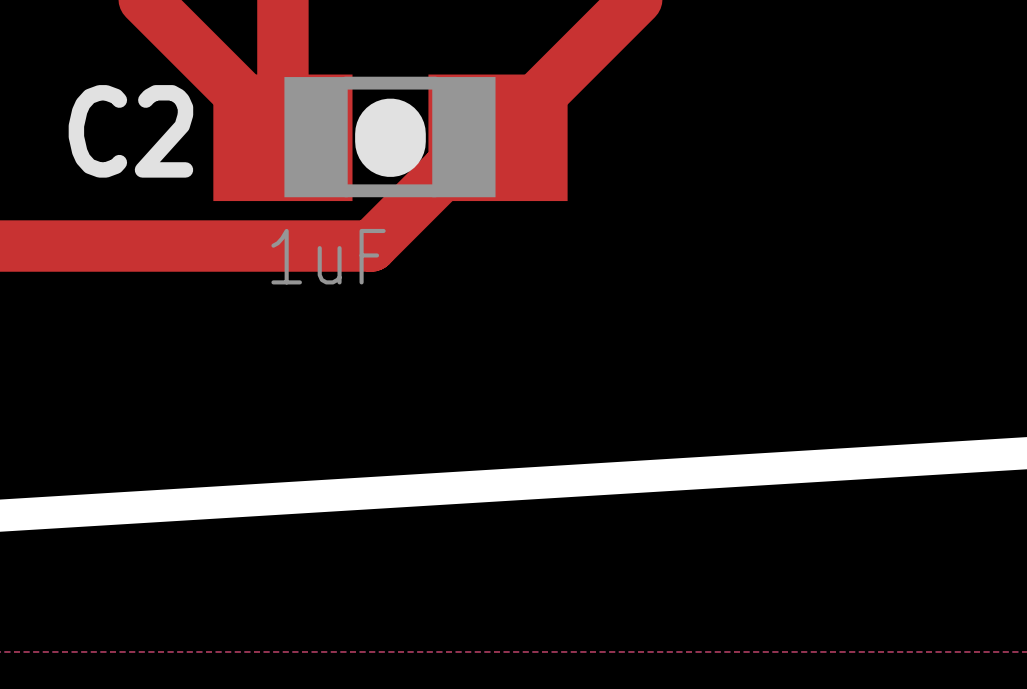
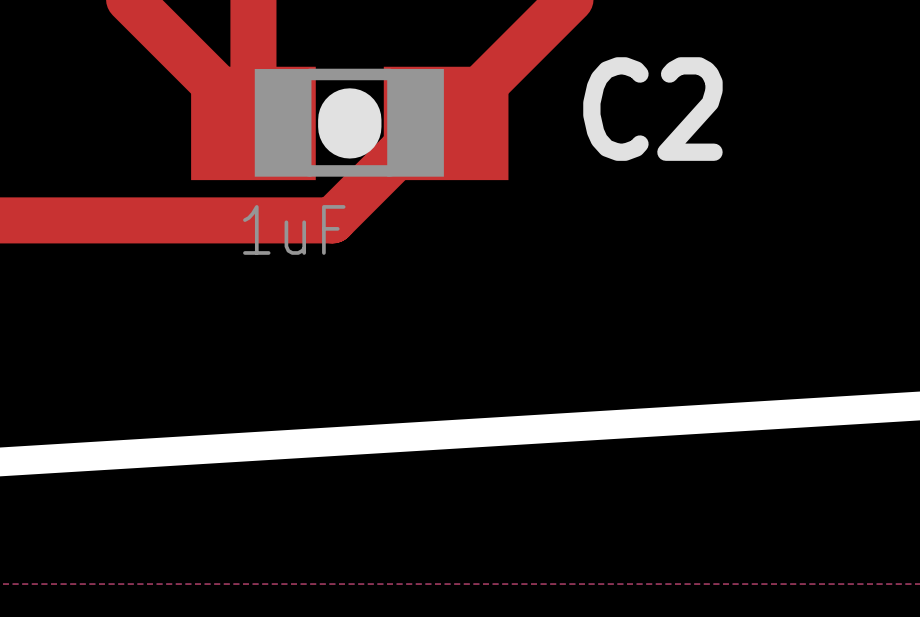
C2 name position: C2 (130, 131) -> C2 (652, 109)

